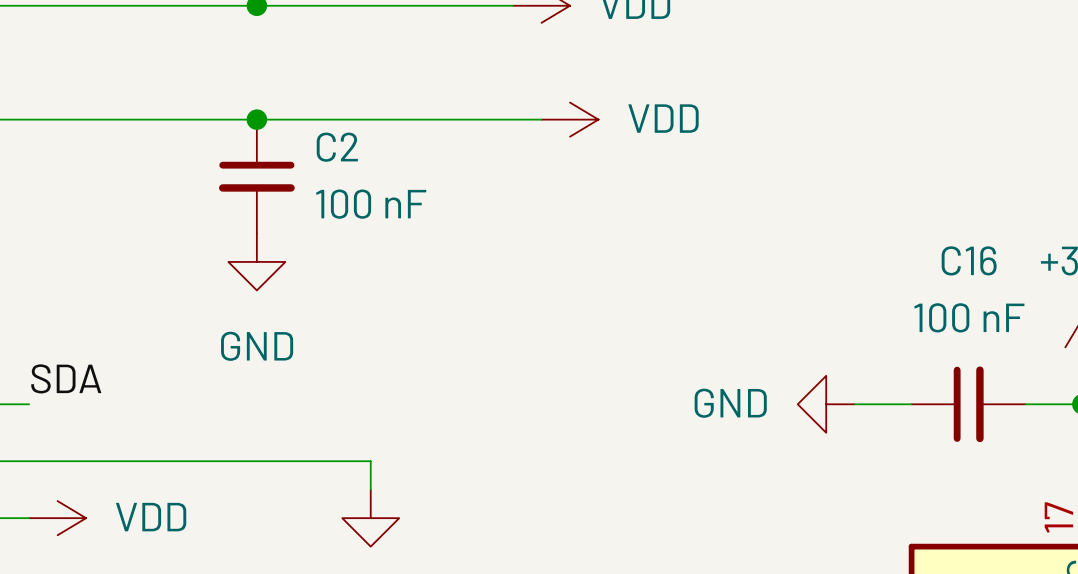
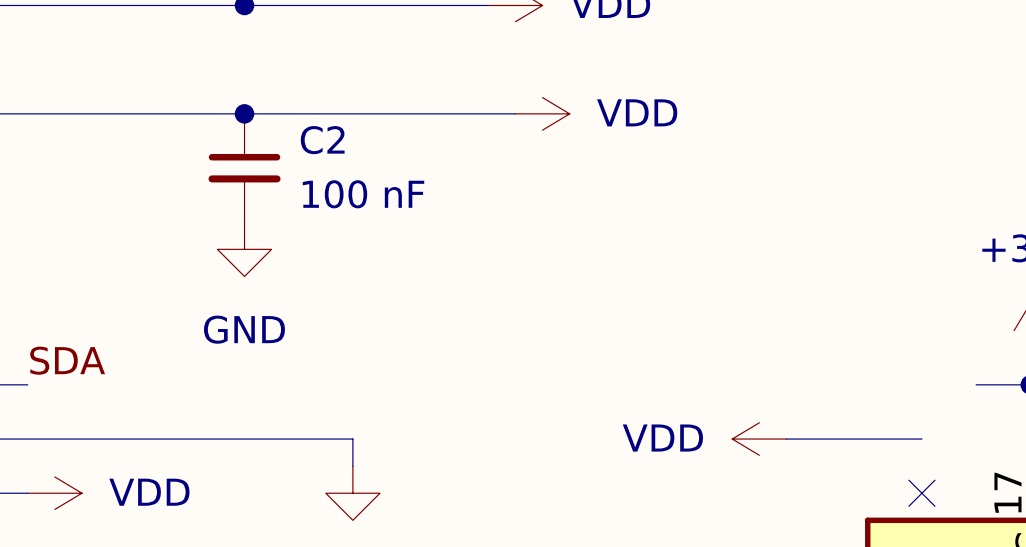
power symbol: GND (826, 404) -> none
wire: (854, 404) (911, 404) -> none
C16: 100 nF (968, 404) -> none
power symbol: none -> VDD (759, 439)
wire: none -> (786, 439) (921, 439)
no-connect mark: none -> (921, 493)

